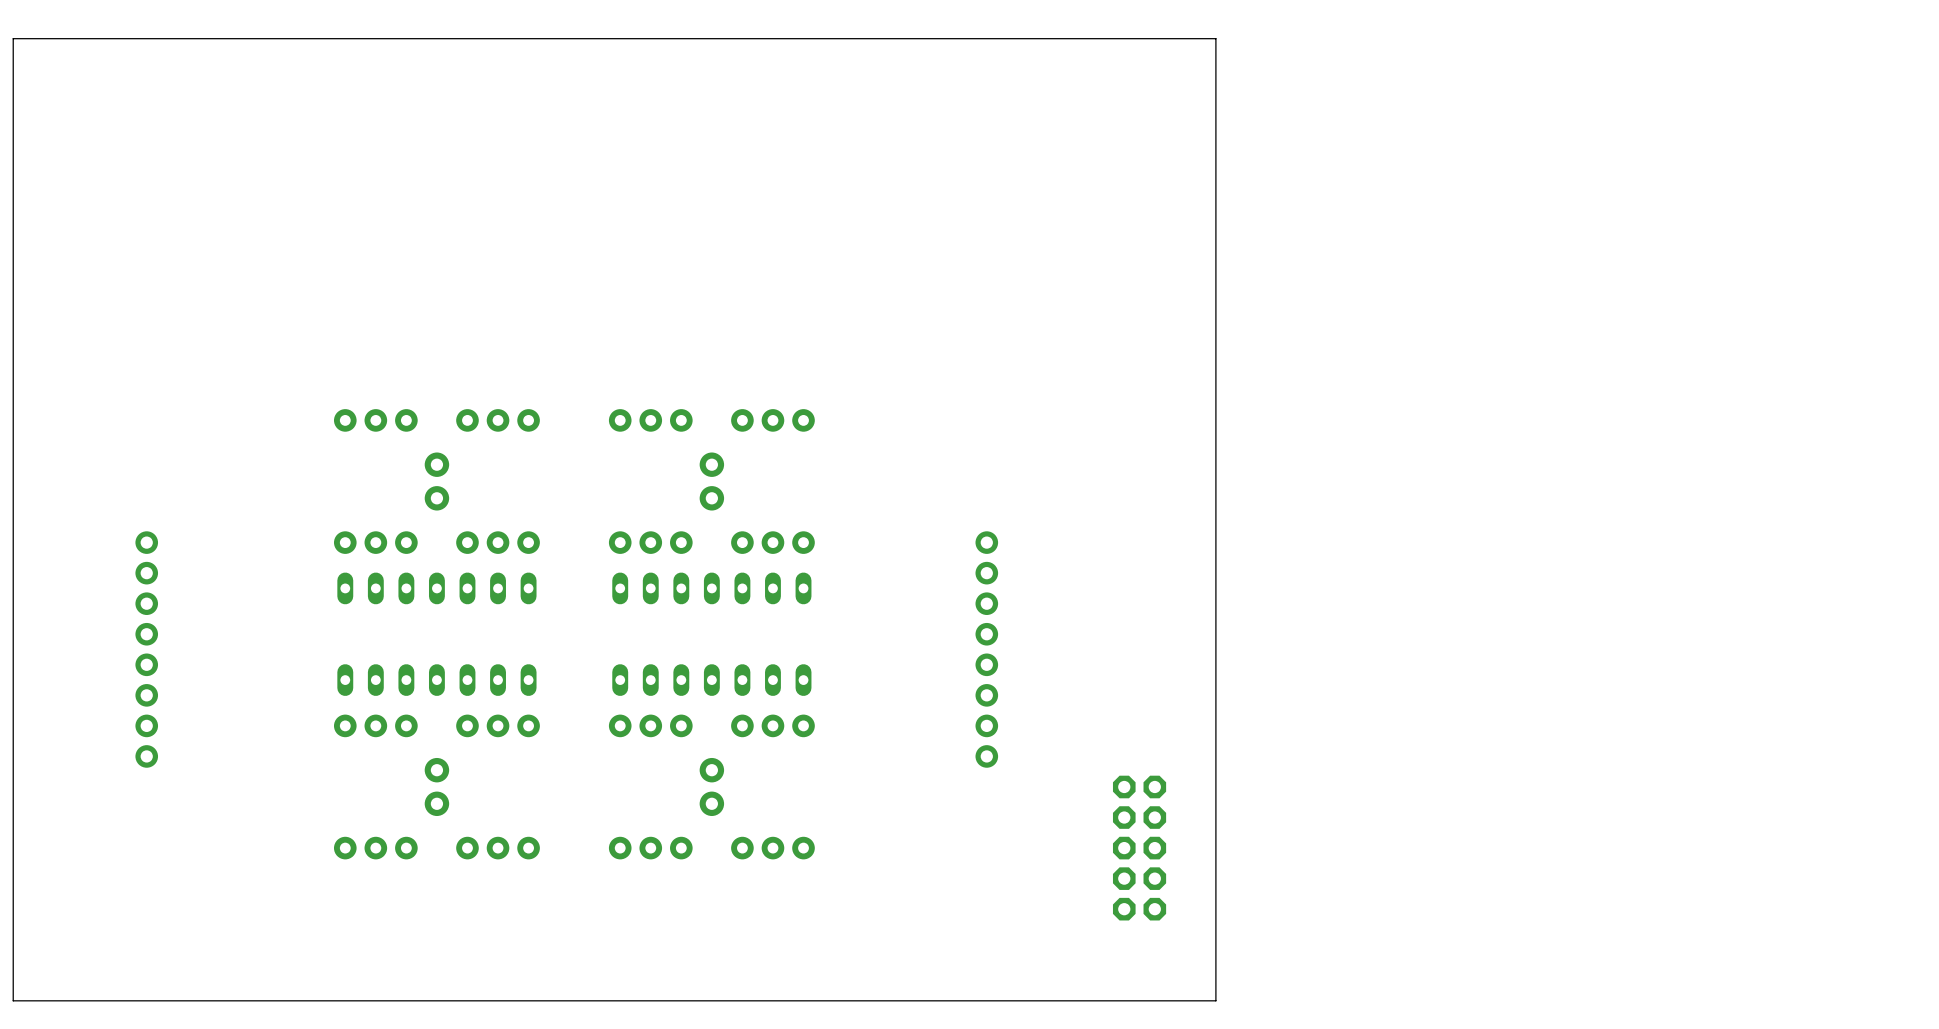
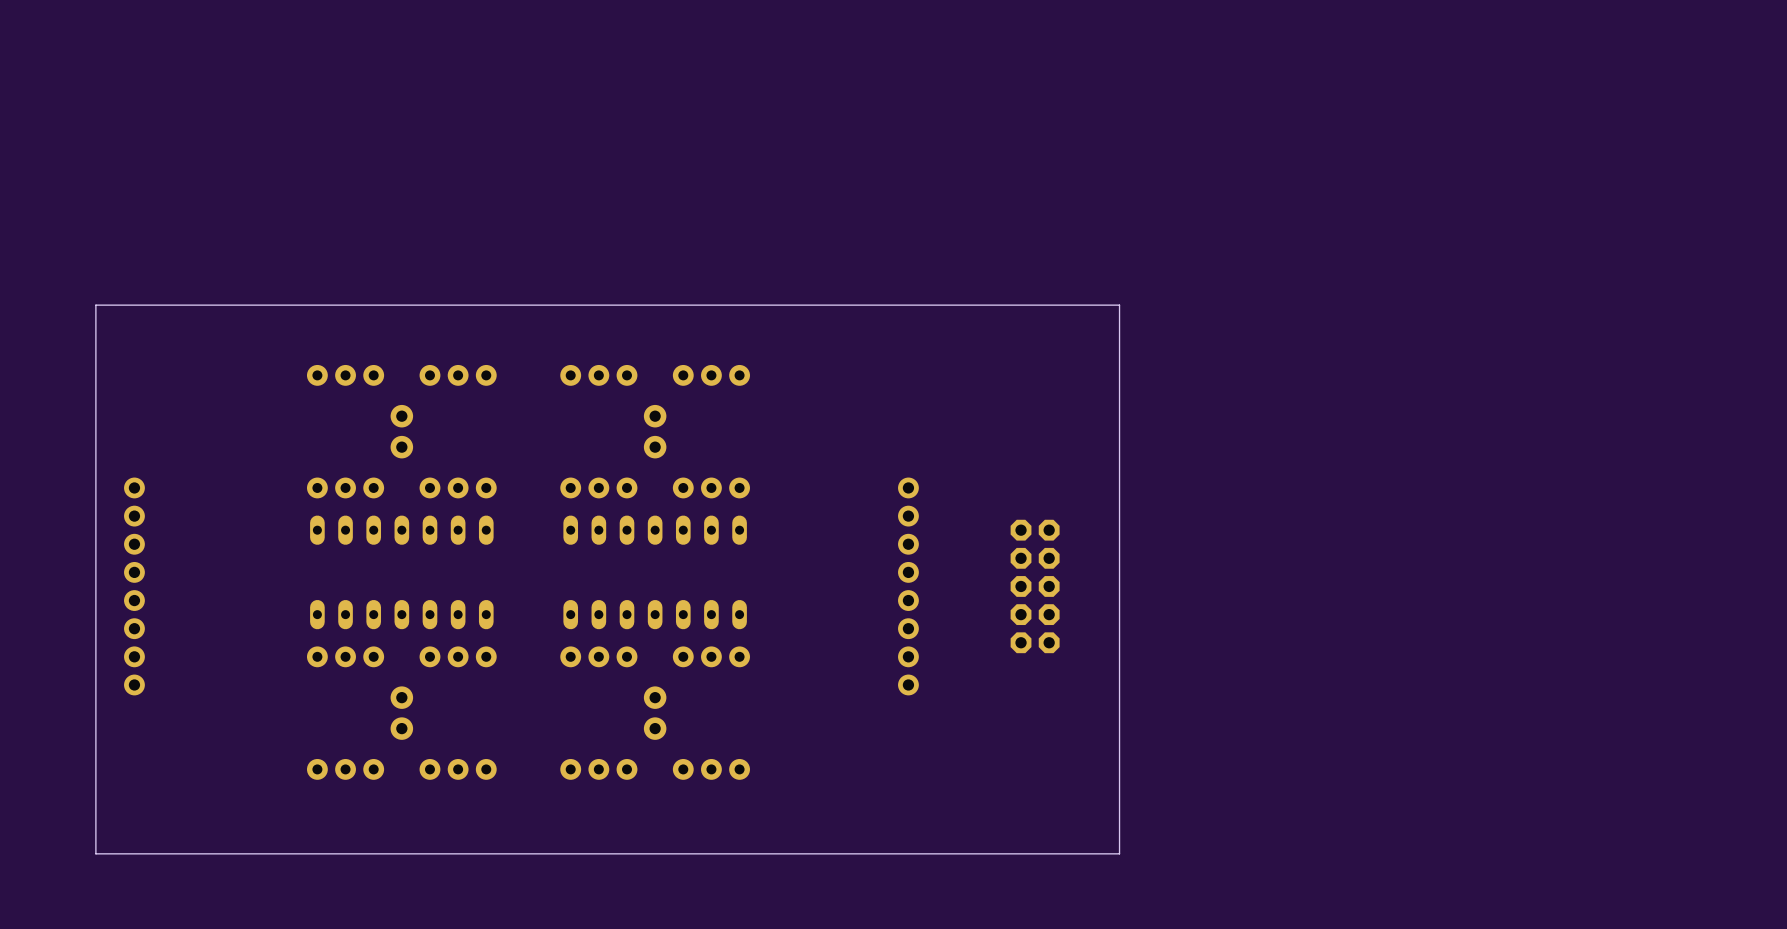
board edge: (1215, 344) (1215, 38) (13, 38) (13, 1000) (1215, 1000) (1215, 939) -> (1119, 305) (95, 305) (95, 853) (1119, 853)
part position: (1139, 848) -> (1035, 586)

